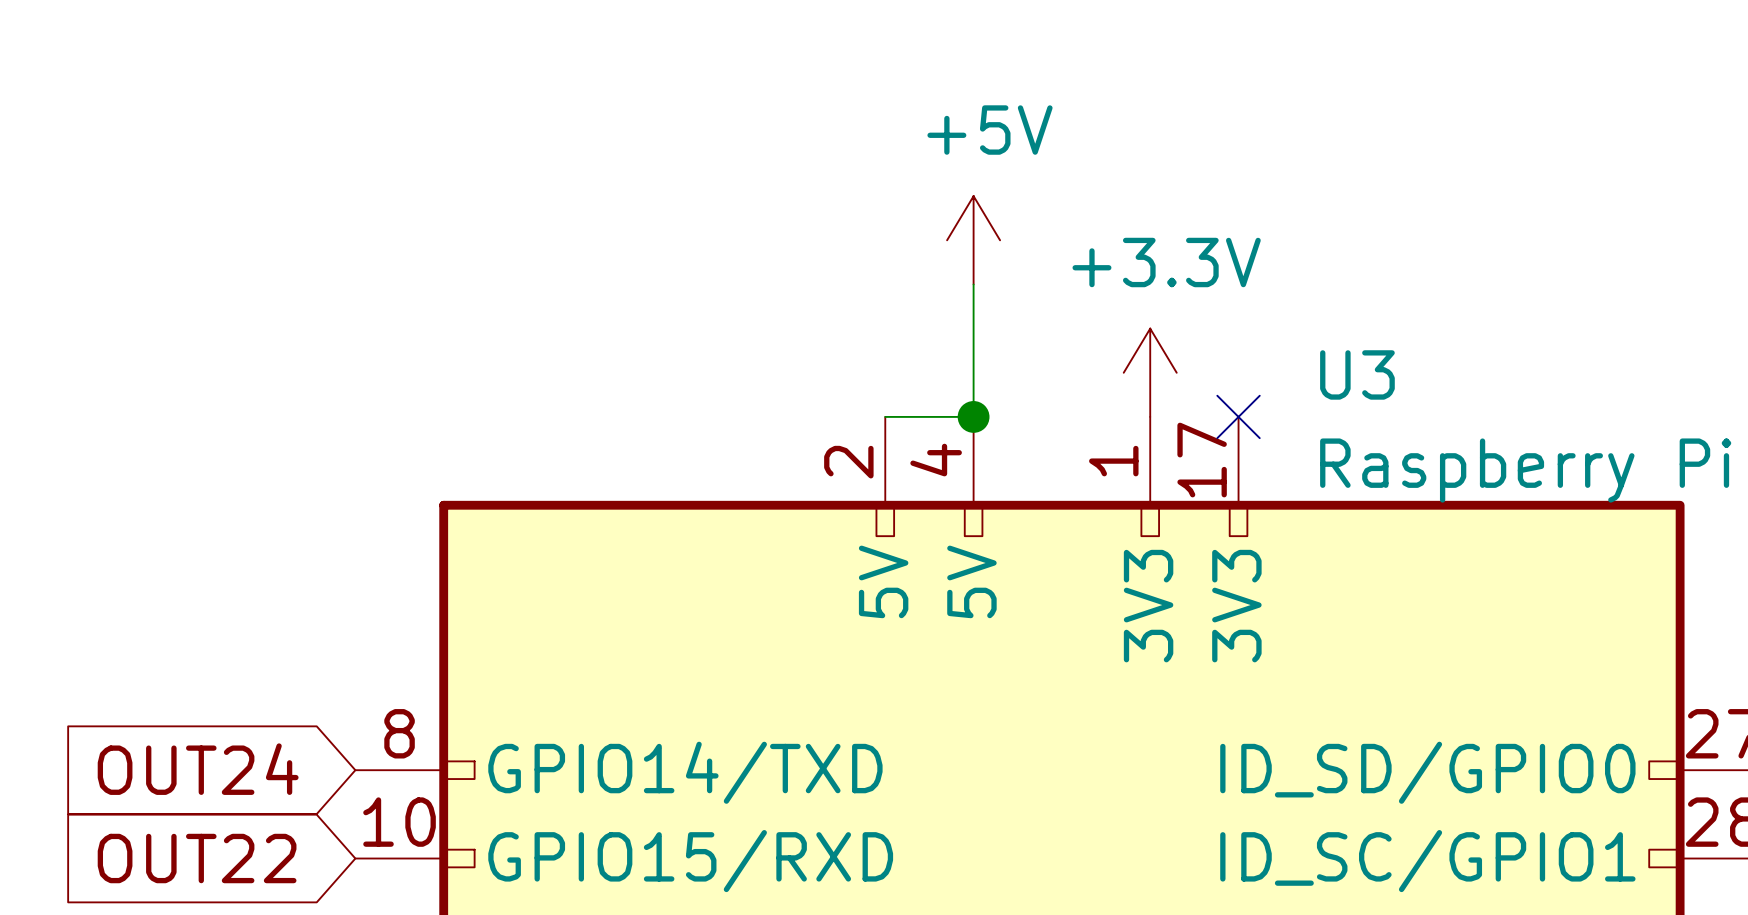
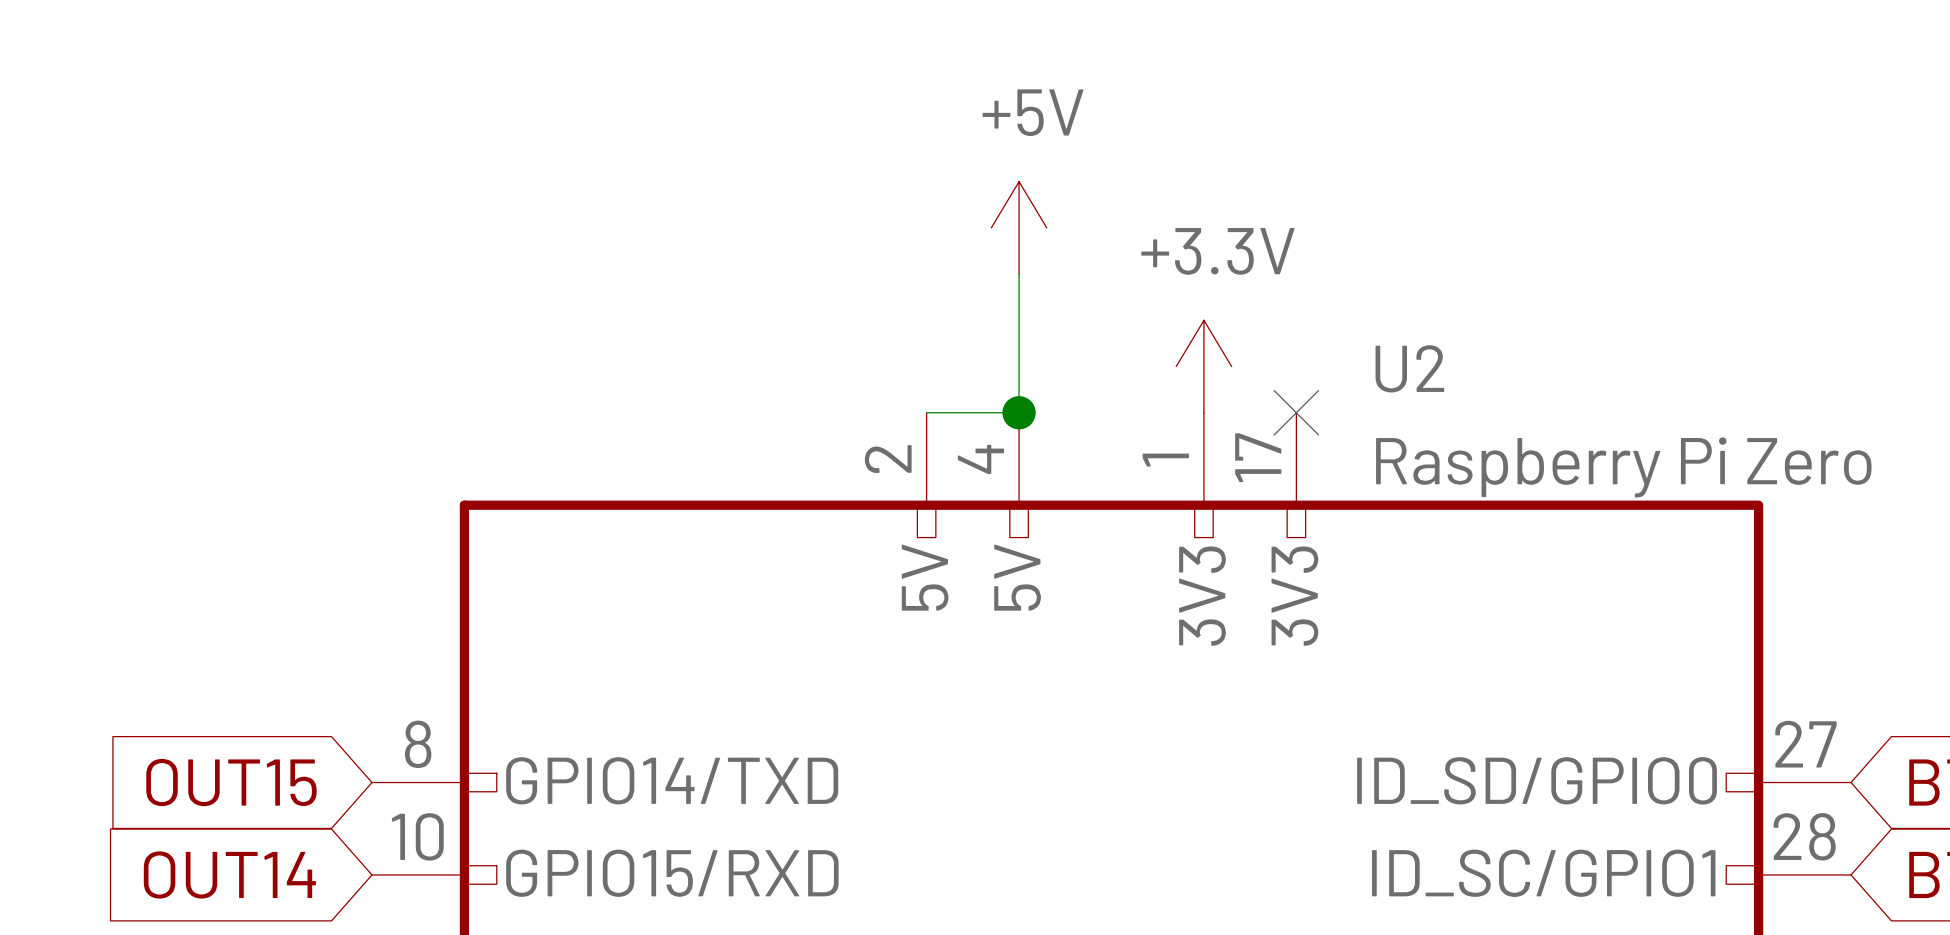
U3 name: U3 (1357, 374) -> U2 (1409, 368)
global label: OUT24 (198, 769) -> OUT15 (231, 782)
global label: OUT22 (197, 858) -> OUT14 (229, 874)

